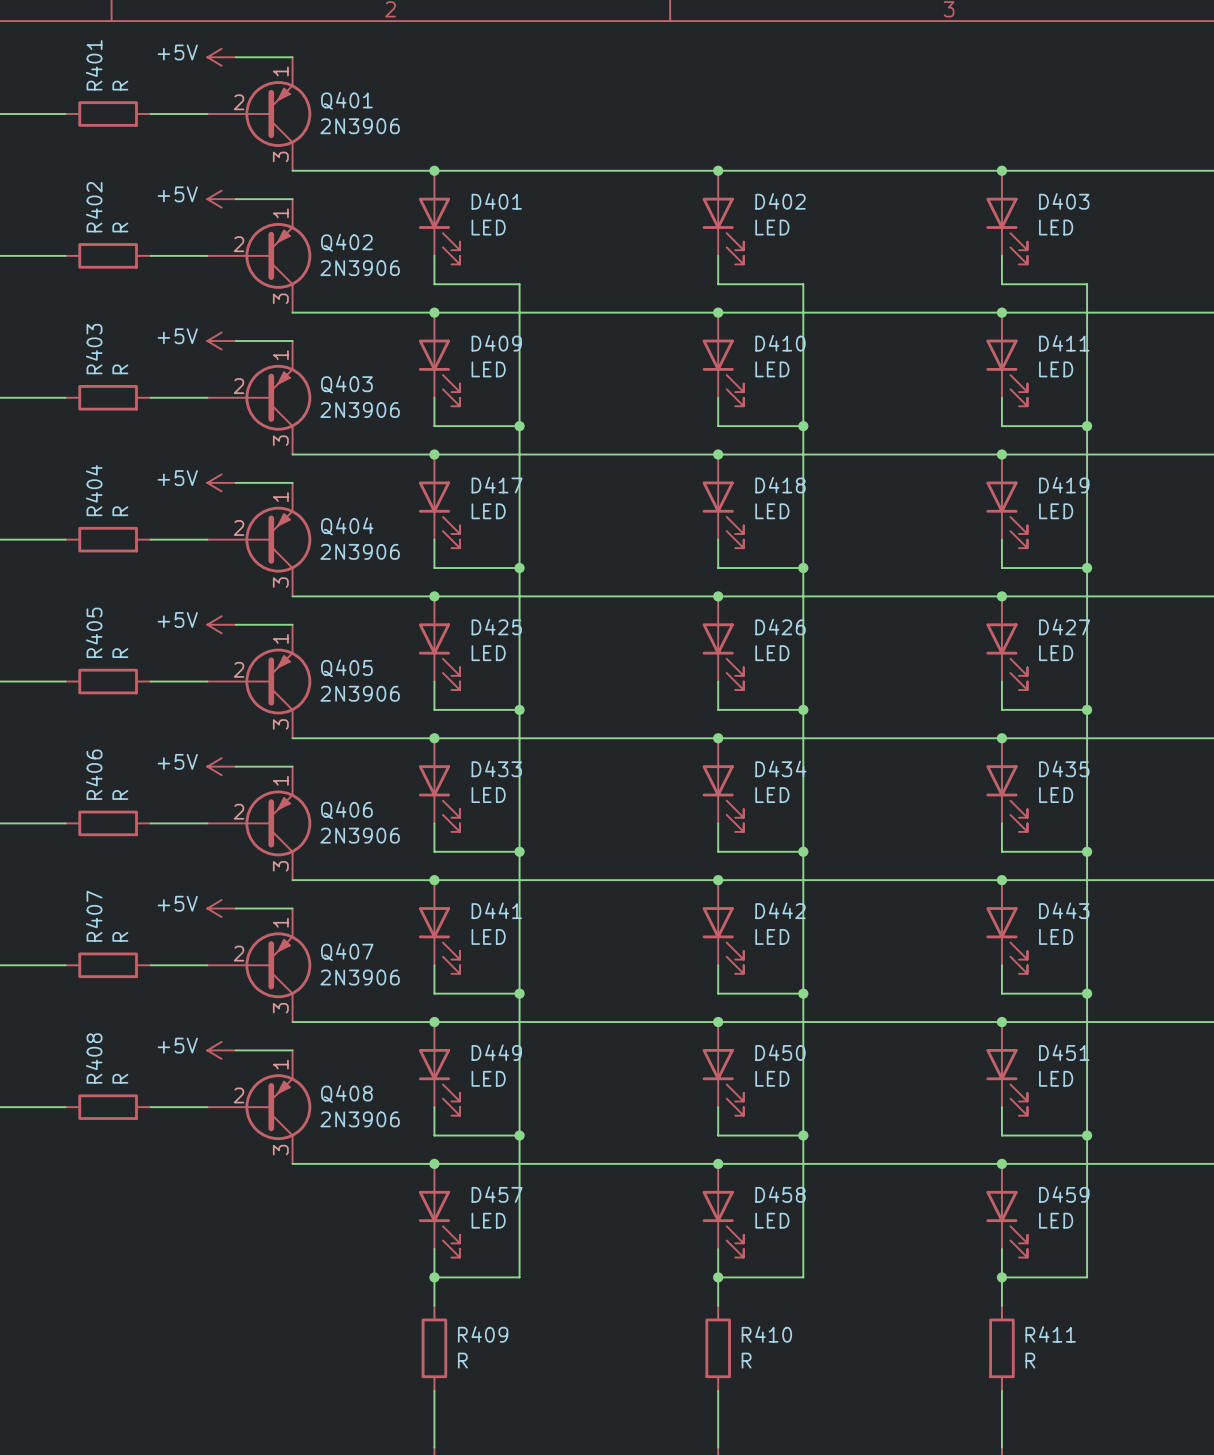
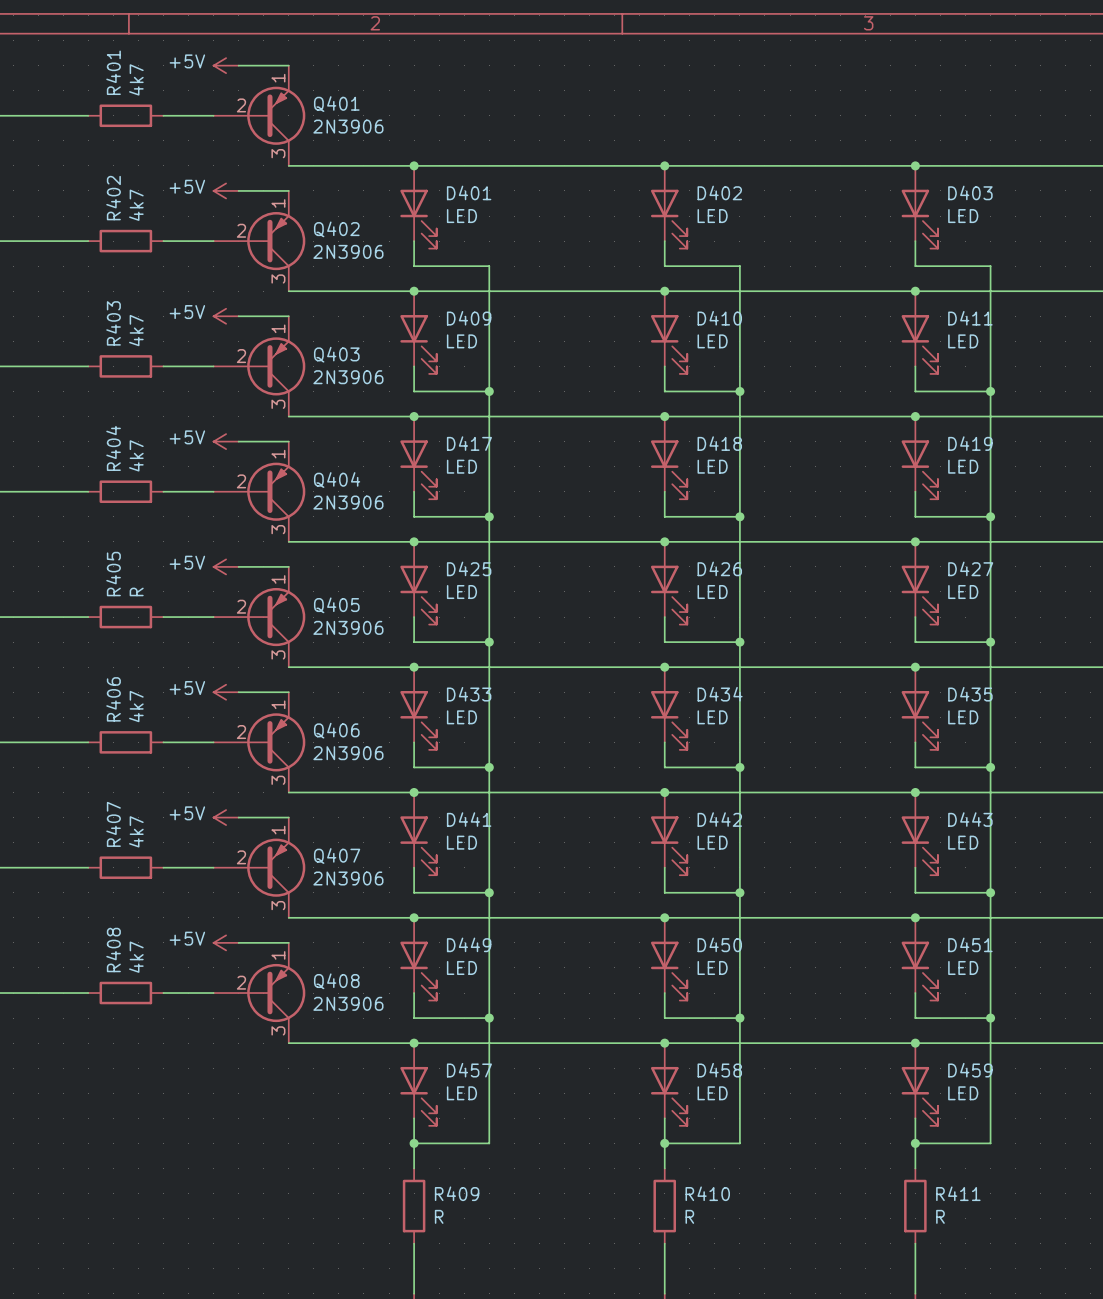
R401 value: R (120, 85) -> 4k7 (136, 79)
R402 value: R (120, 227) -> 4k7 (136, 205)
R403 value: R (120, 369) -> 4k7 (136, 330)
R404 value: R (120, 511) -> 4k7 (136, 455)
R406 value: R (120, 794) -> 4k7 (136, 706)
R407 value: R (120, 936) -> 4k7 (136, 831)
R408 value: R (120, 1078) -> 4k7 (136, 957)

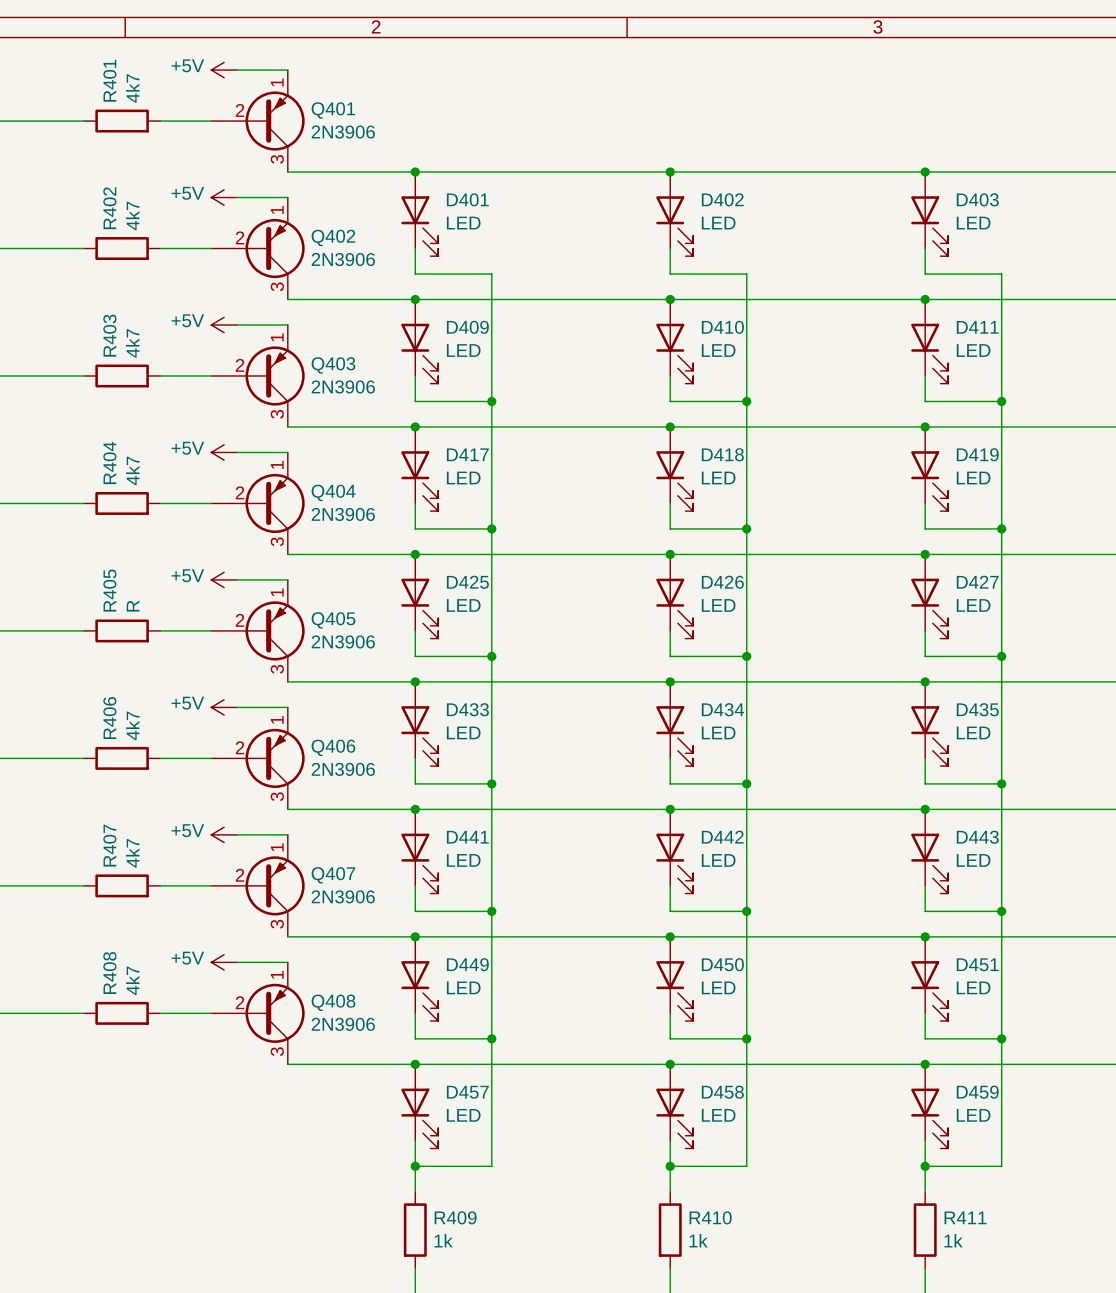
R409 value: R (439, 1216) -> 1k (443, 1240)
R410 value: R (689, 1216) -> 1k (698, 1240)
R411 value: R (940, 1216) -> 1k (953, 1240)

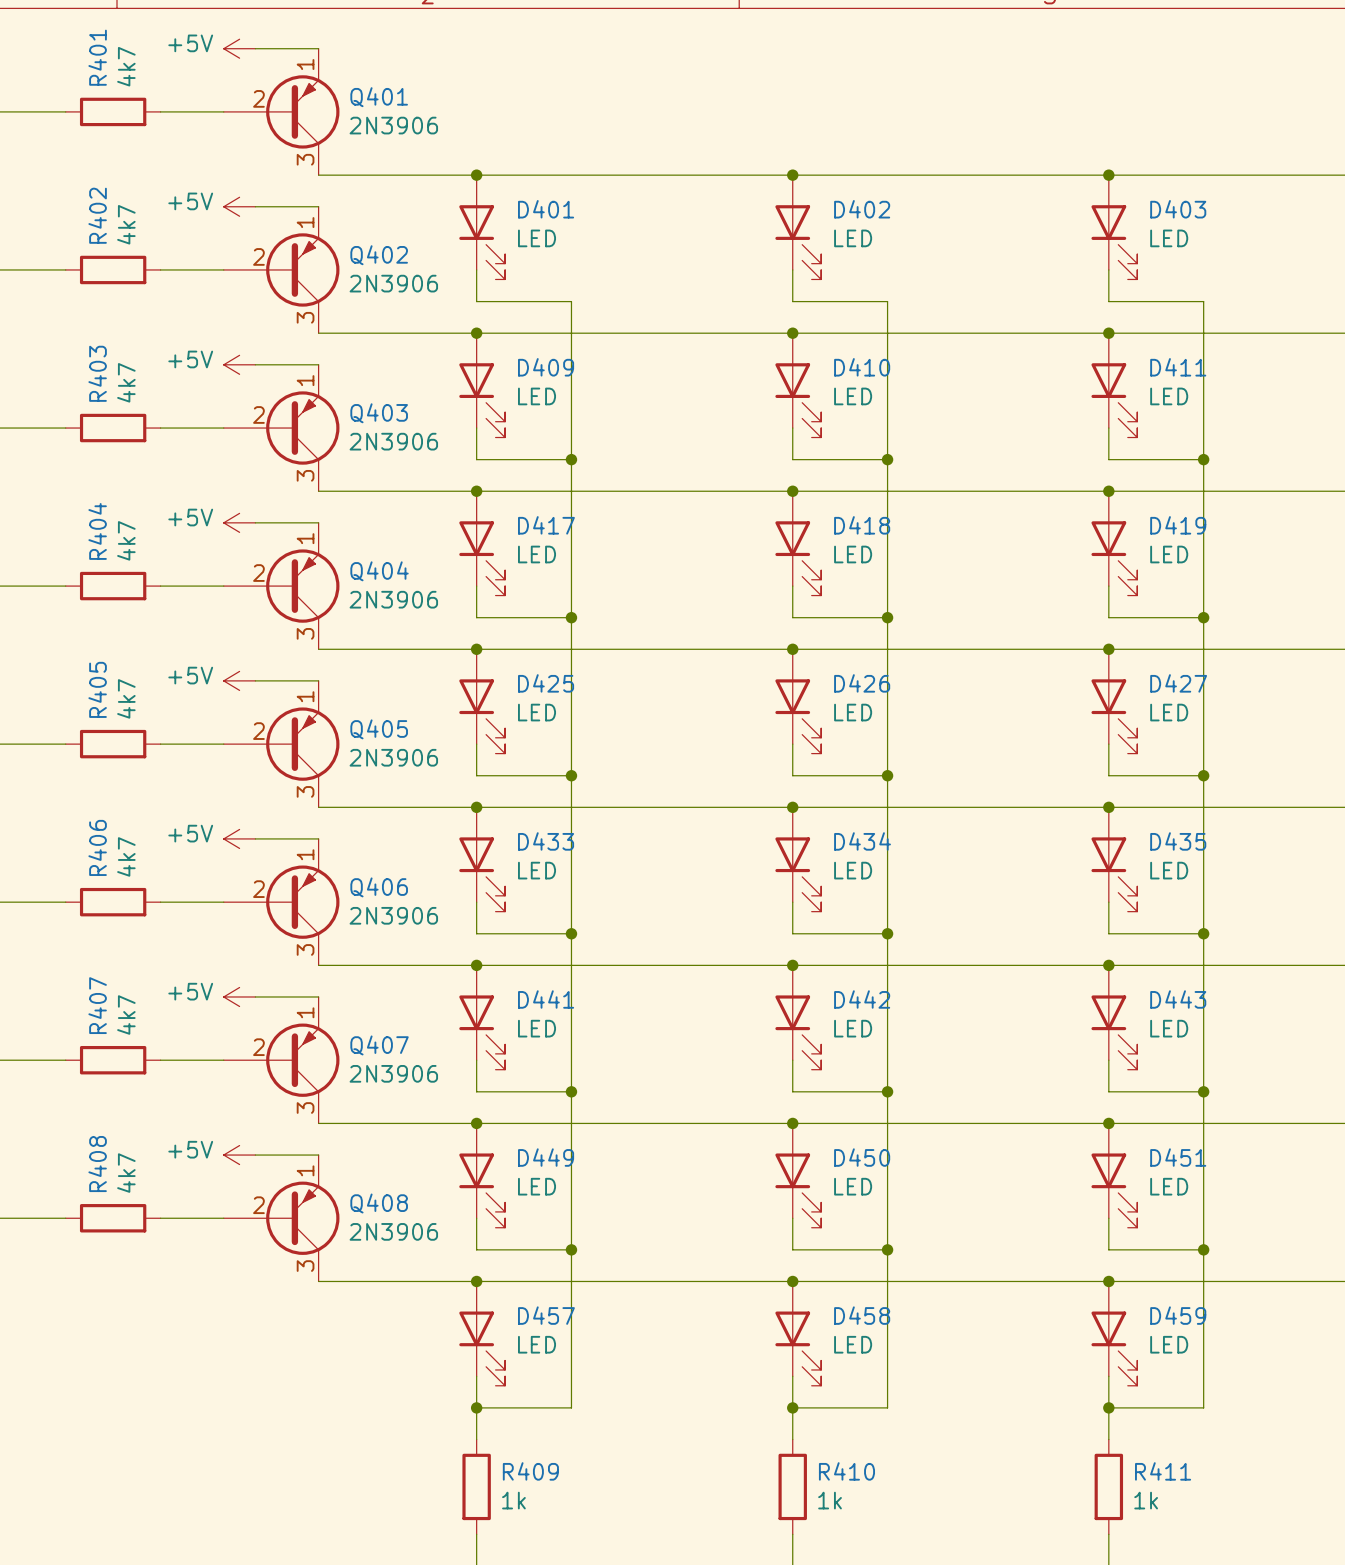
R405 value: R (133, 606) -> 4k7 (126, 698)

